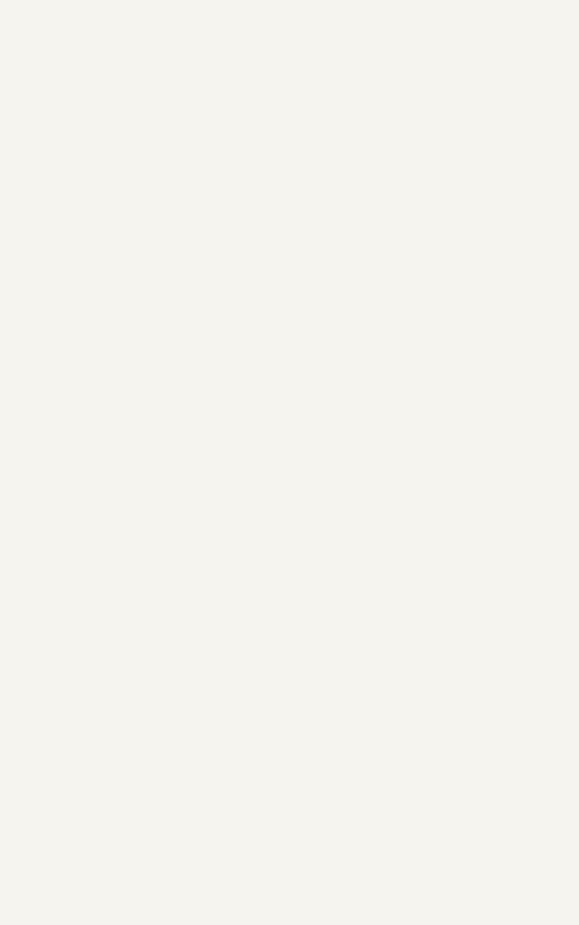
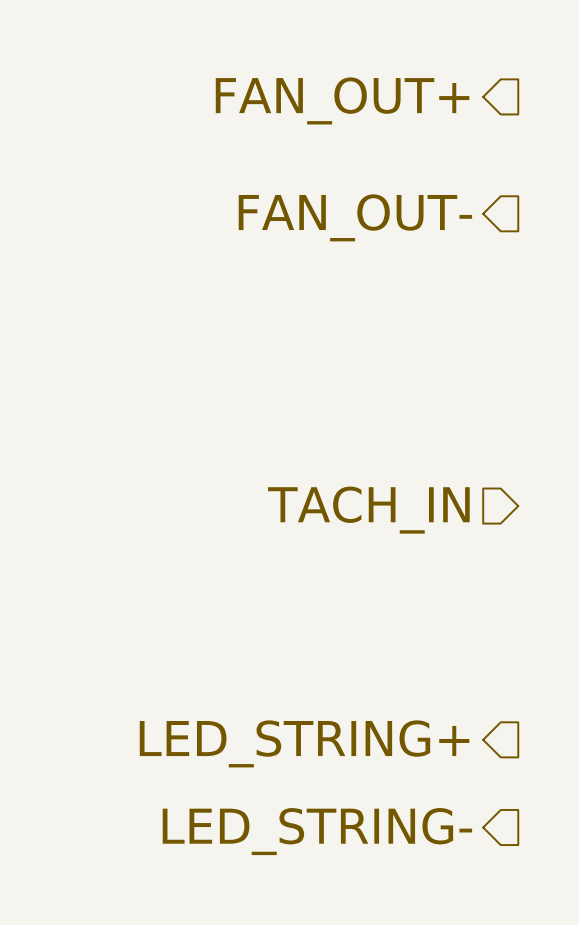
hierarchical label: none -> FAN_OUT+ (342, 100)
hierarchical label: none -> FAN_OUT- (355, 217)
hierarchical label: none -> TACH_IN (368, 510)
hierarchical label: none -> LED_STRING+ (304, 743)
hierarchical label: none -> LED_STRING- (317, 831)

